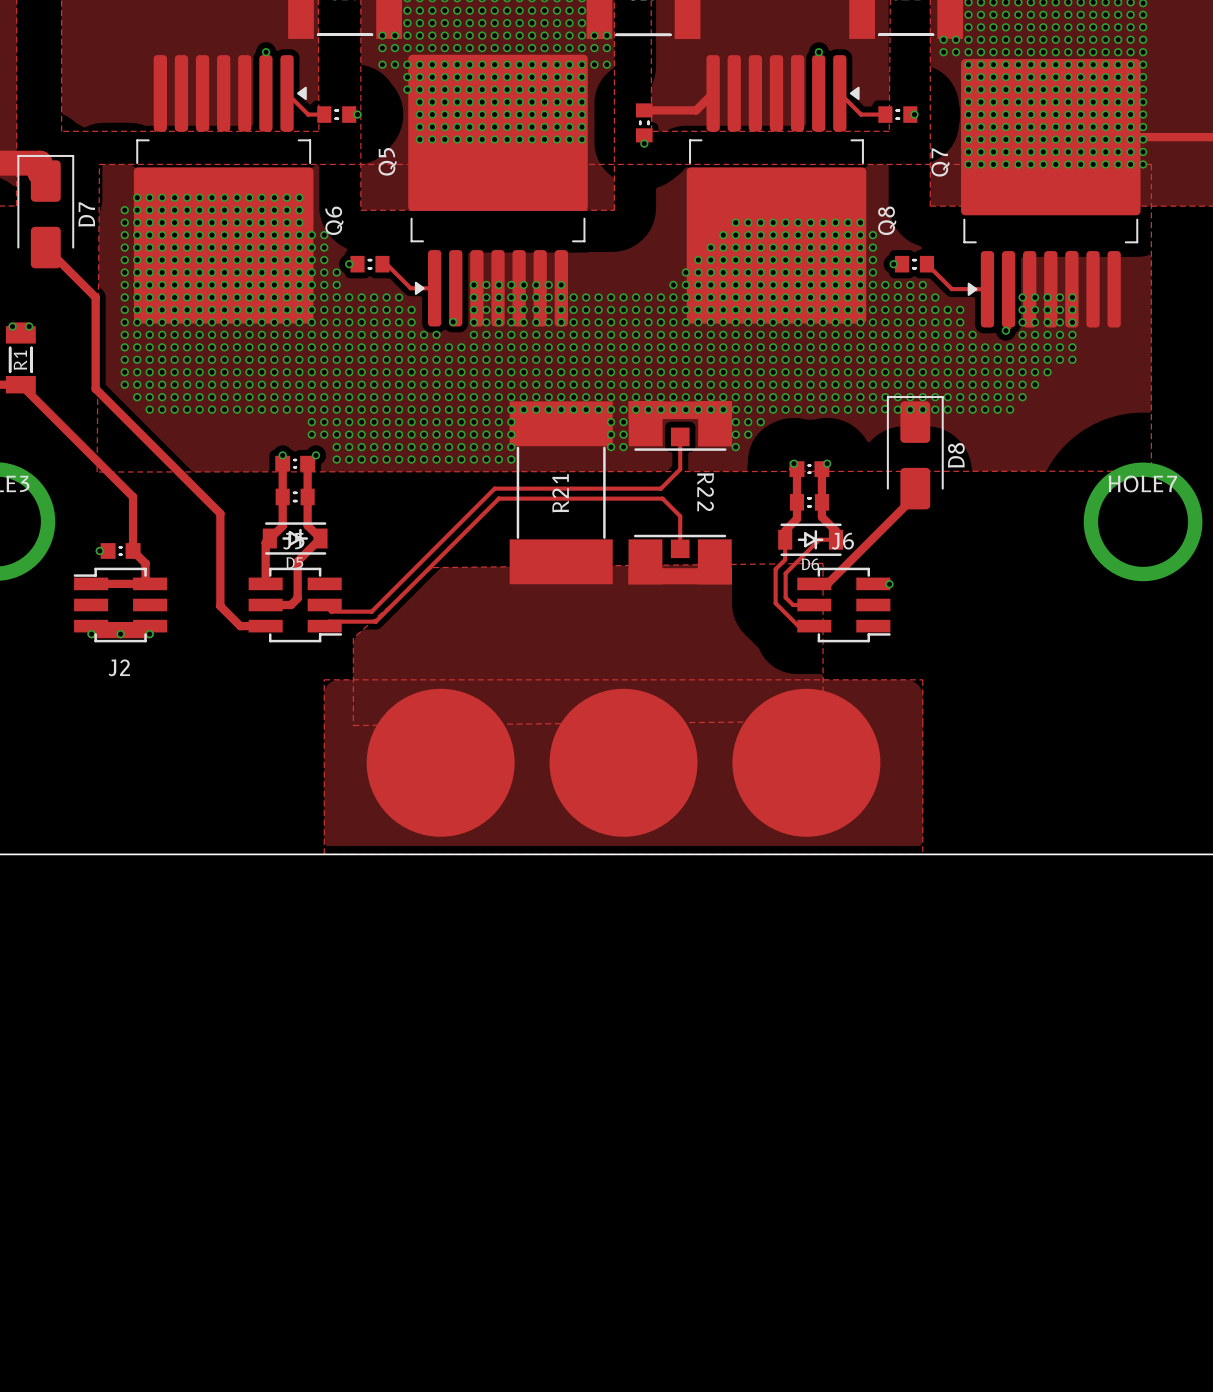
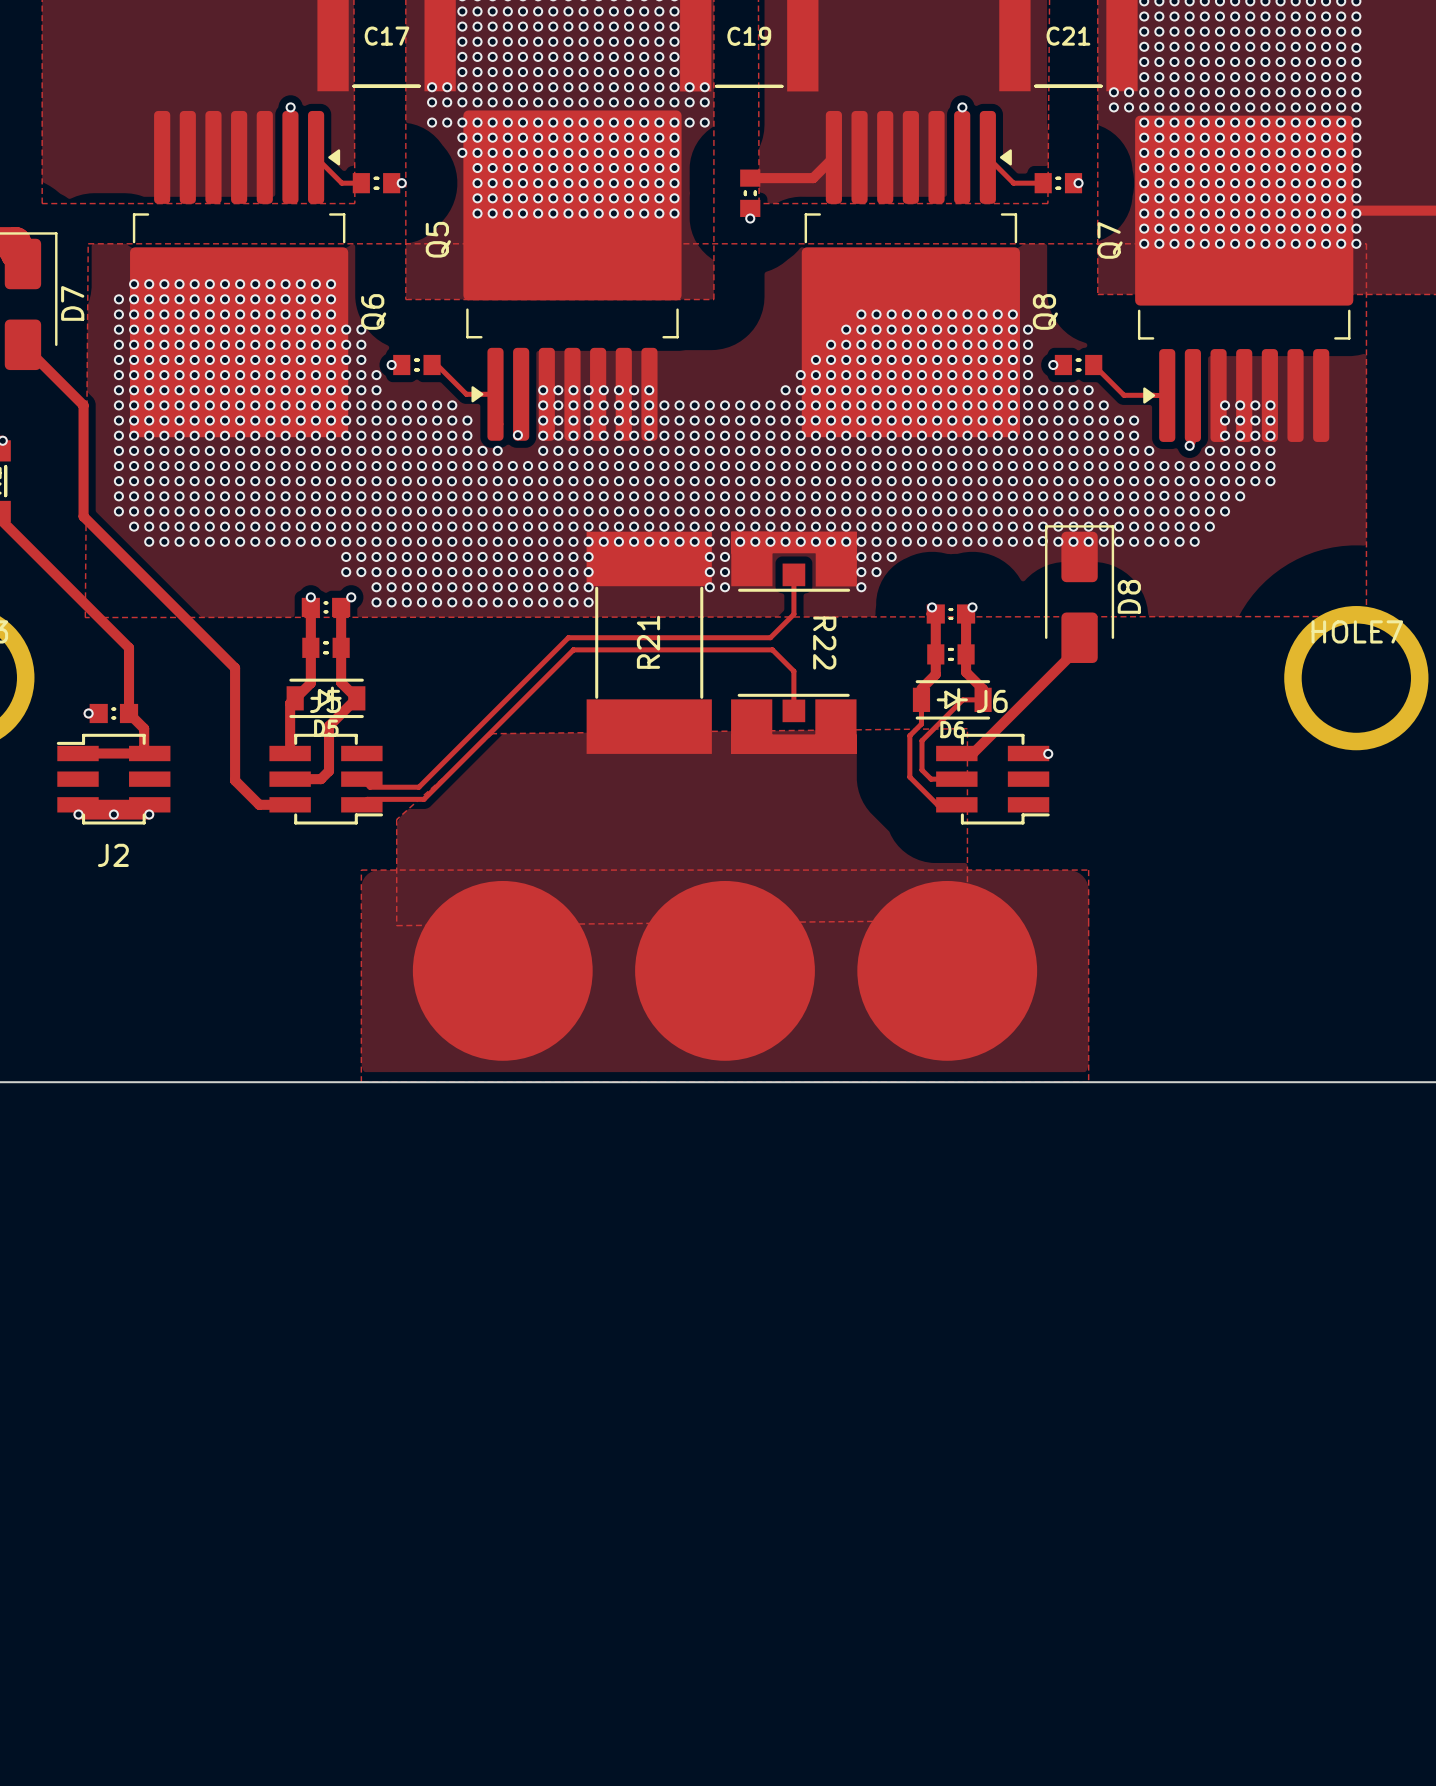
via: (1022, 297) -> none
via: (1022, 309) -> none
via: (1022, 322) -> none

